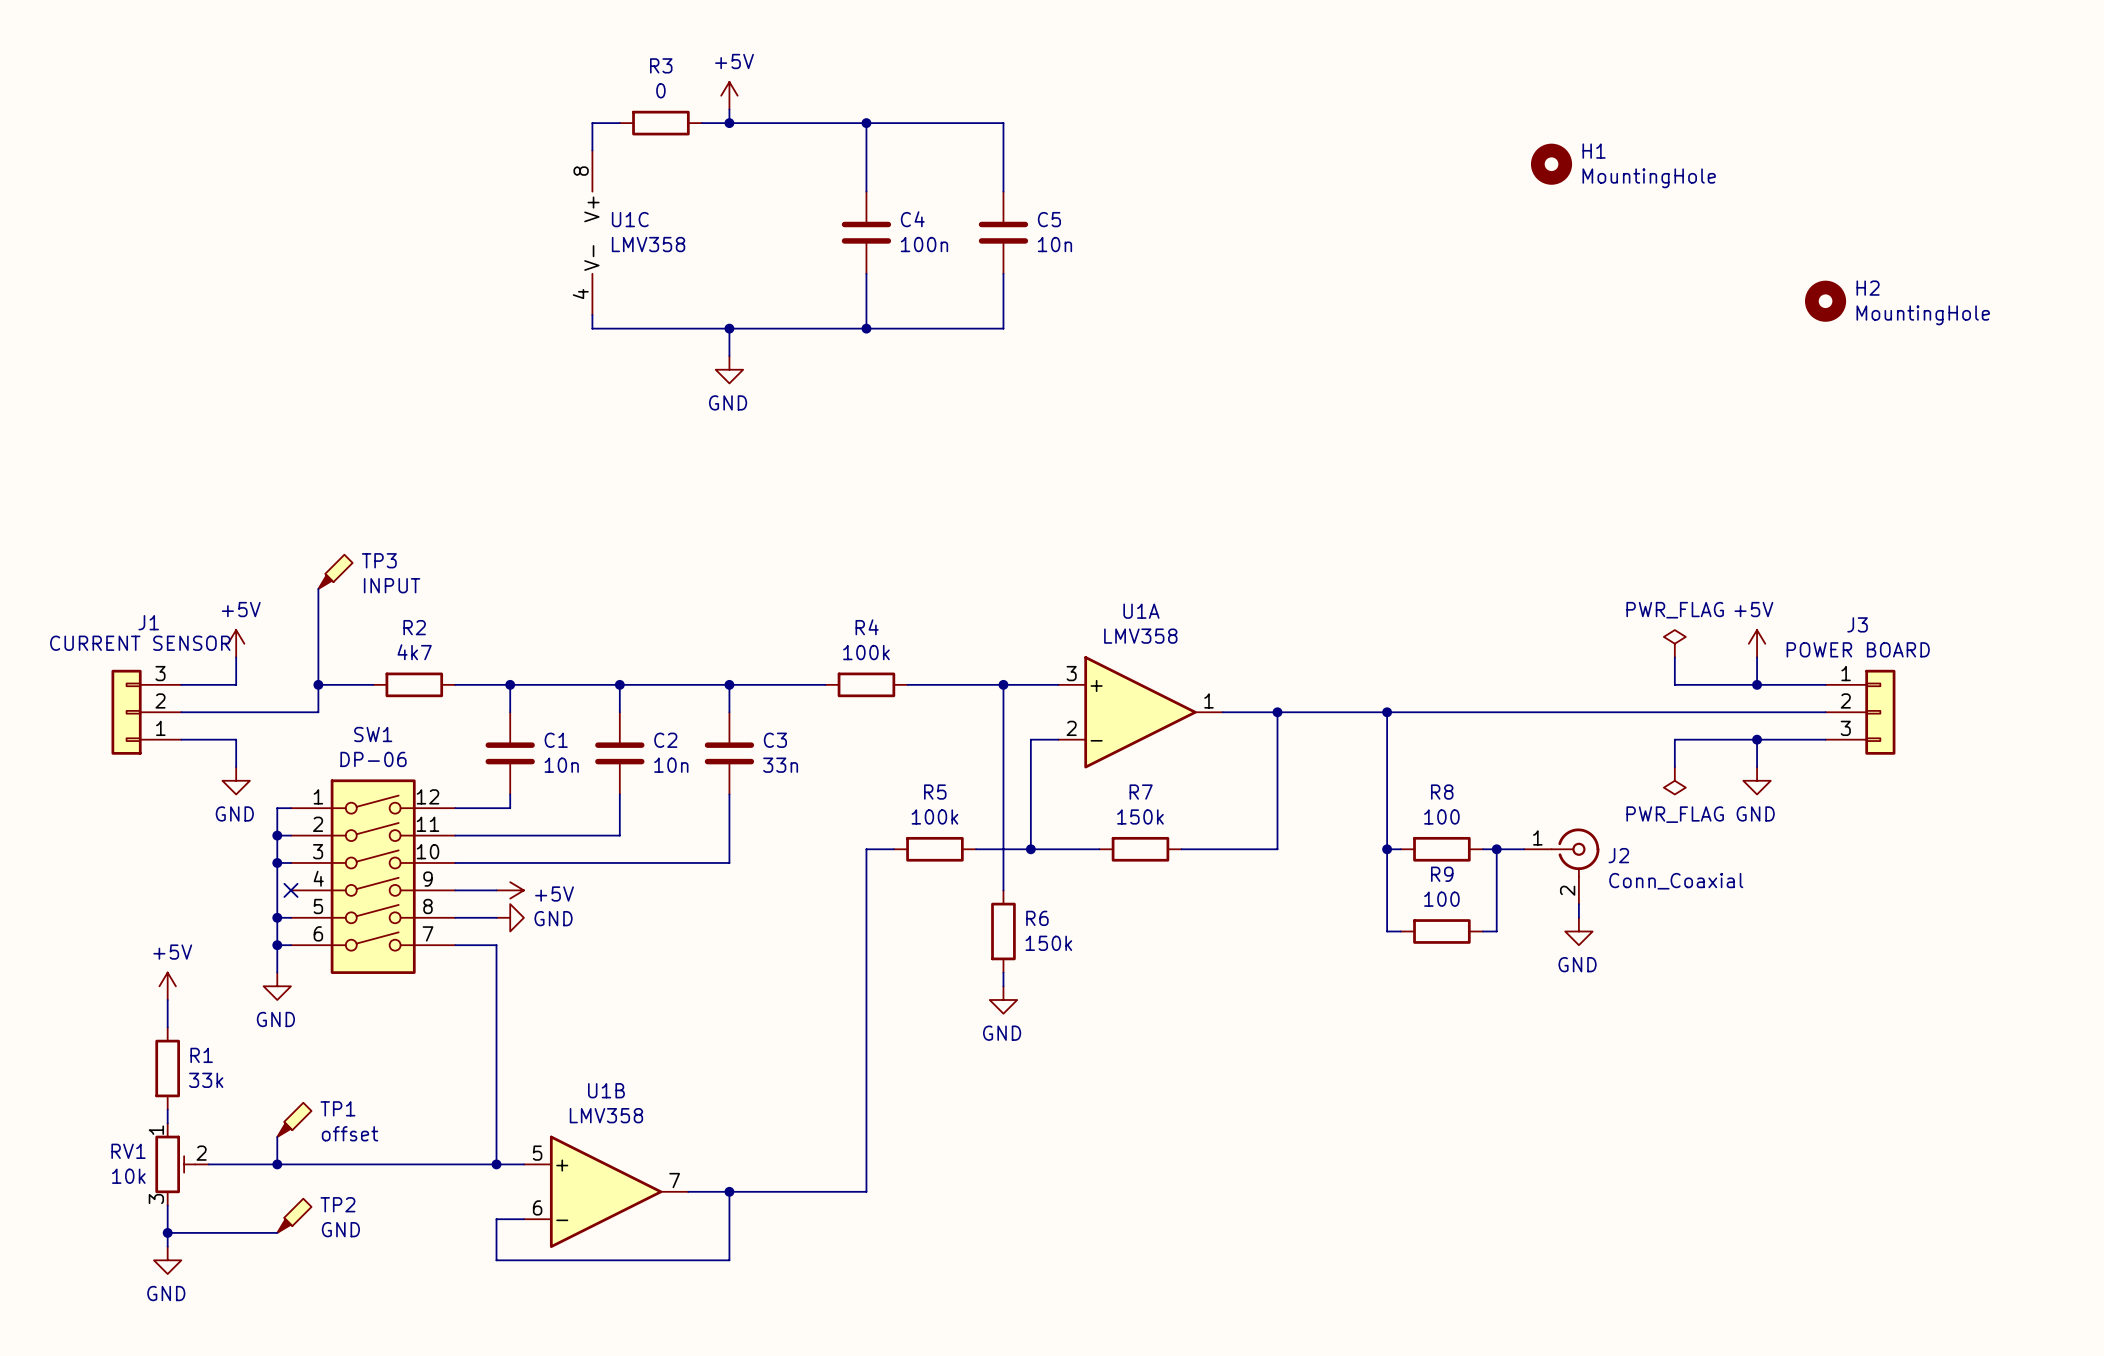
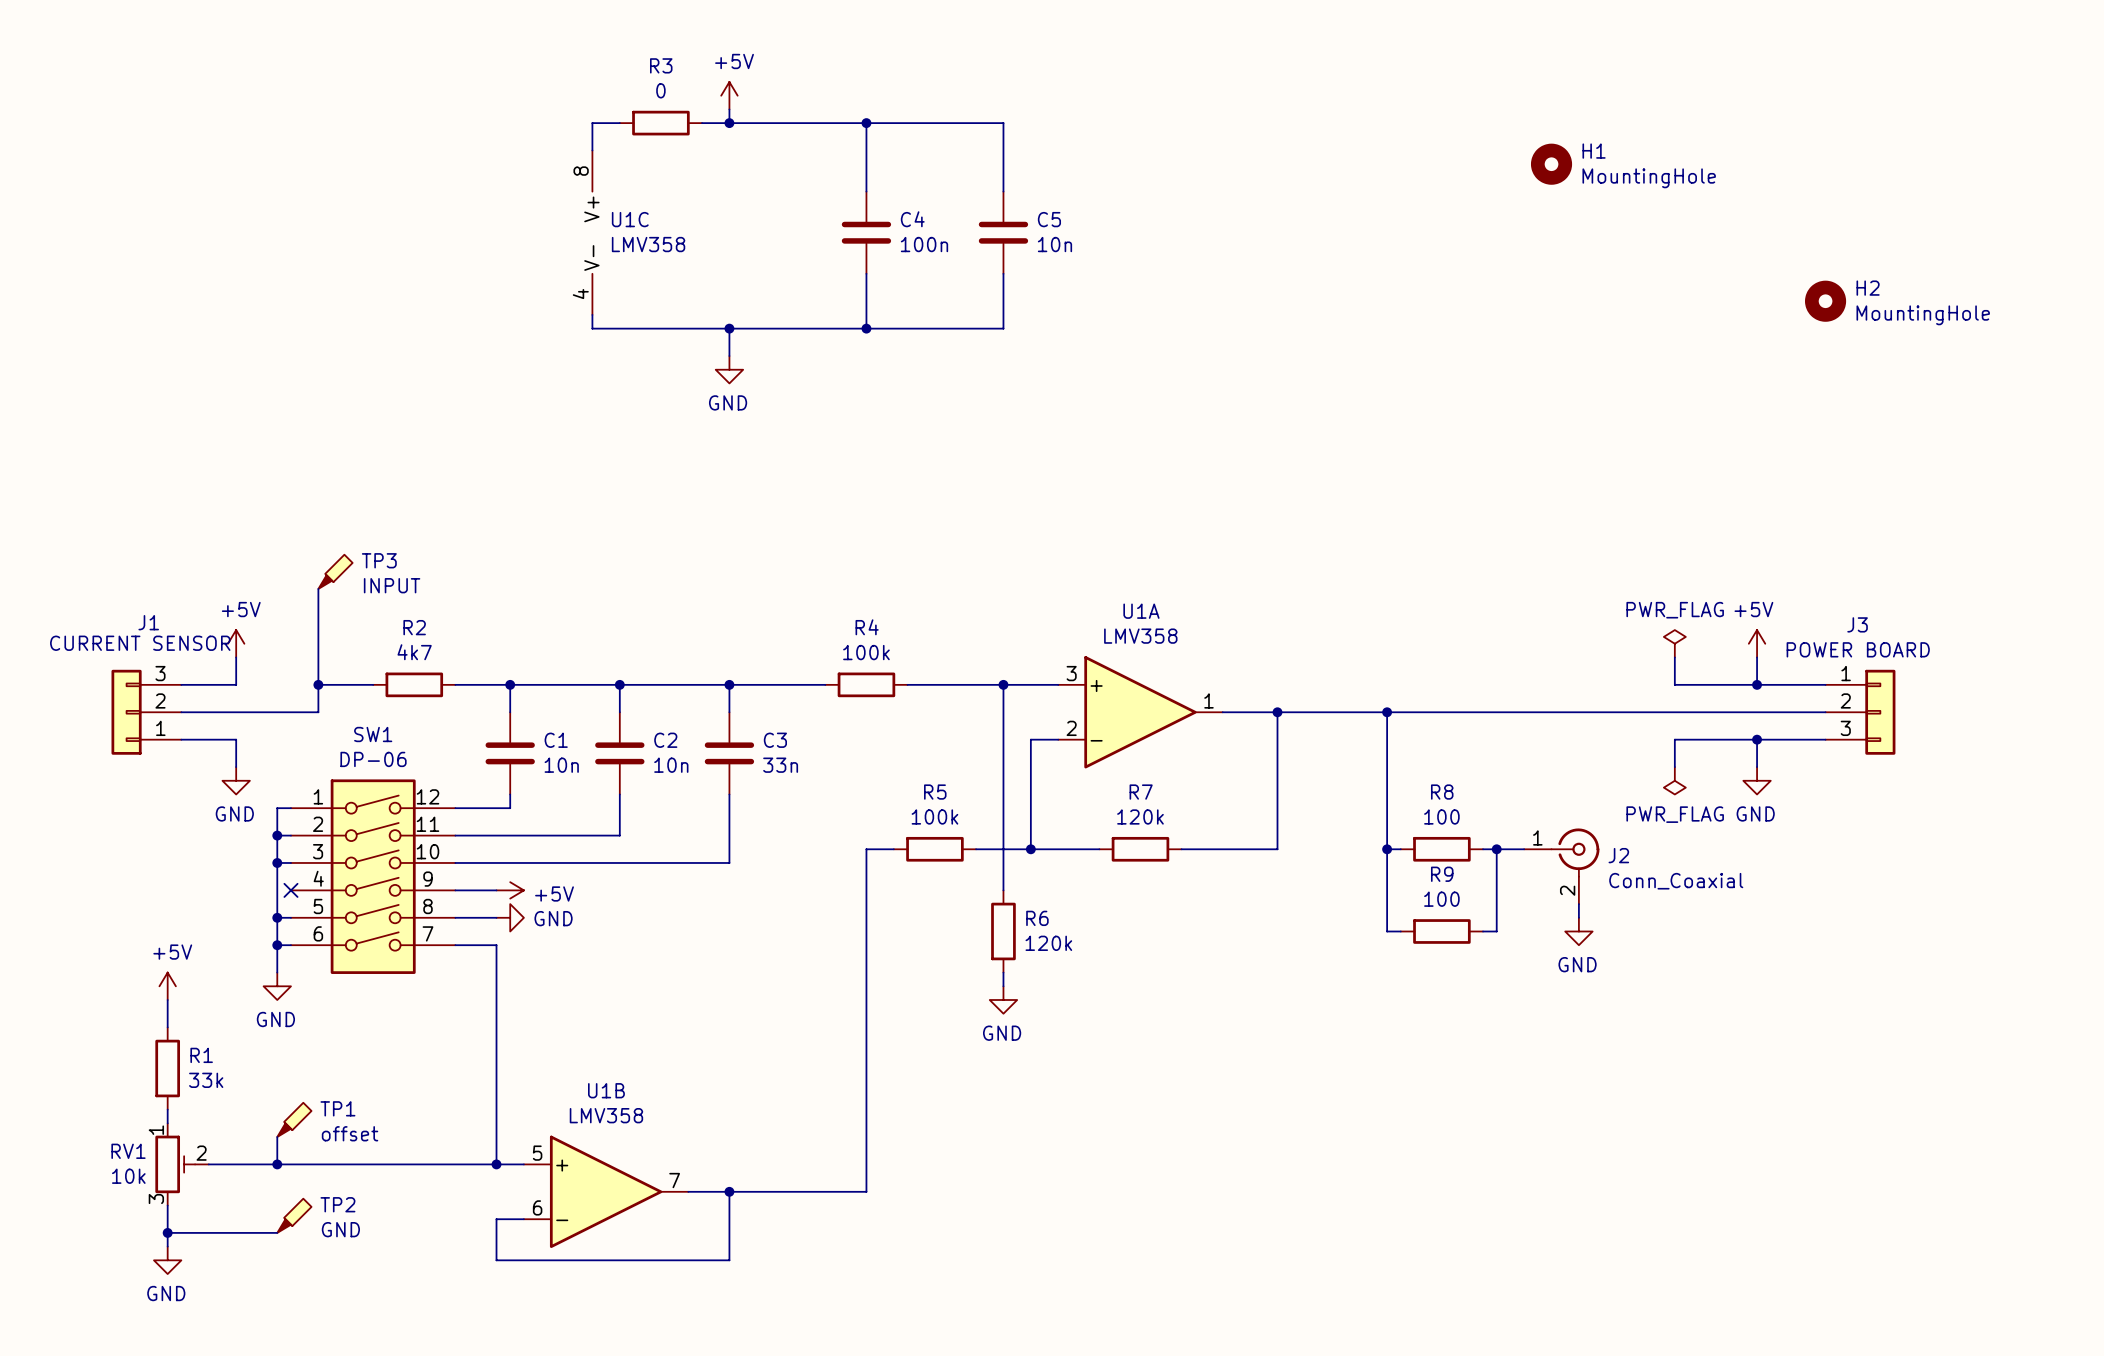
R7 value: 150k (1140, 816) -> 120k (1140, 816)
R6 value: 150k (1048, 943) -> 120k (1048, 943)

